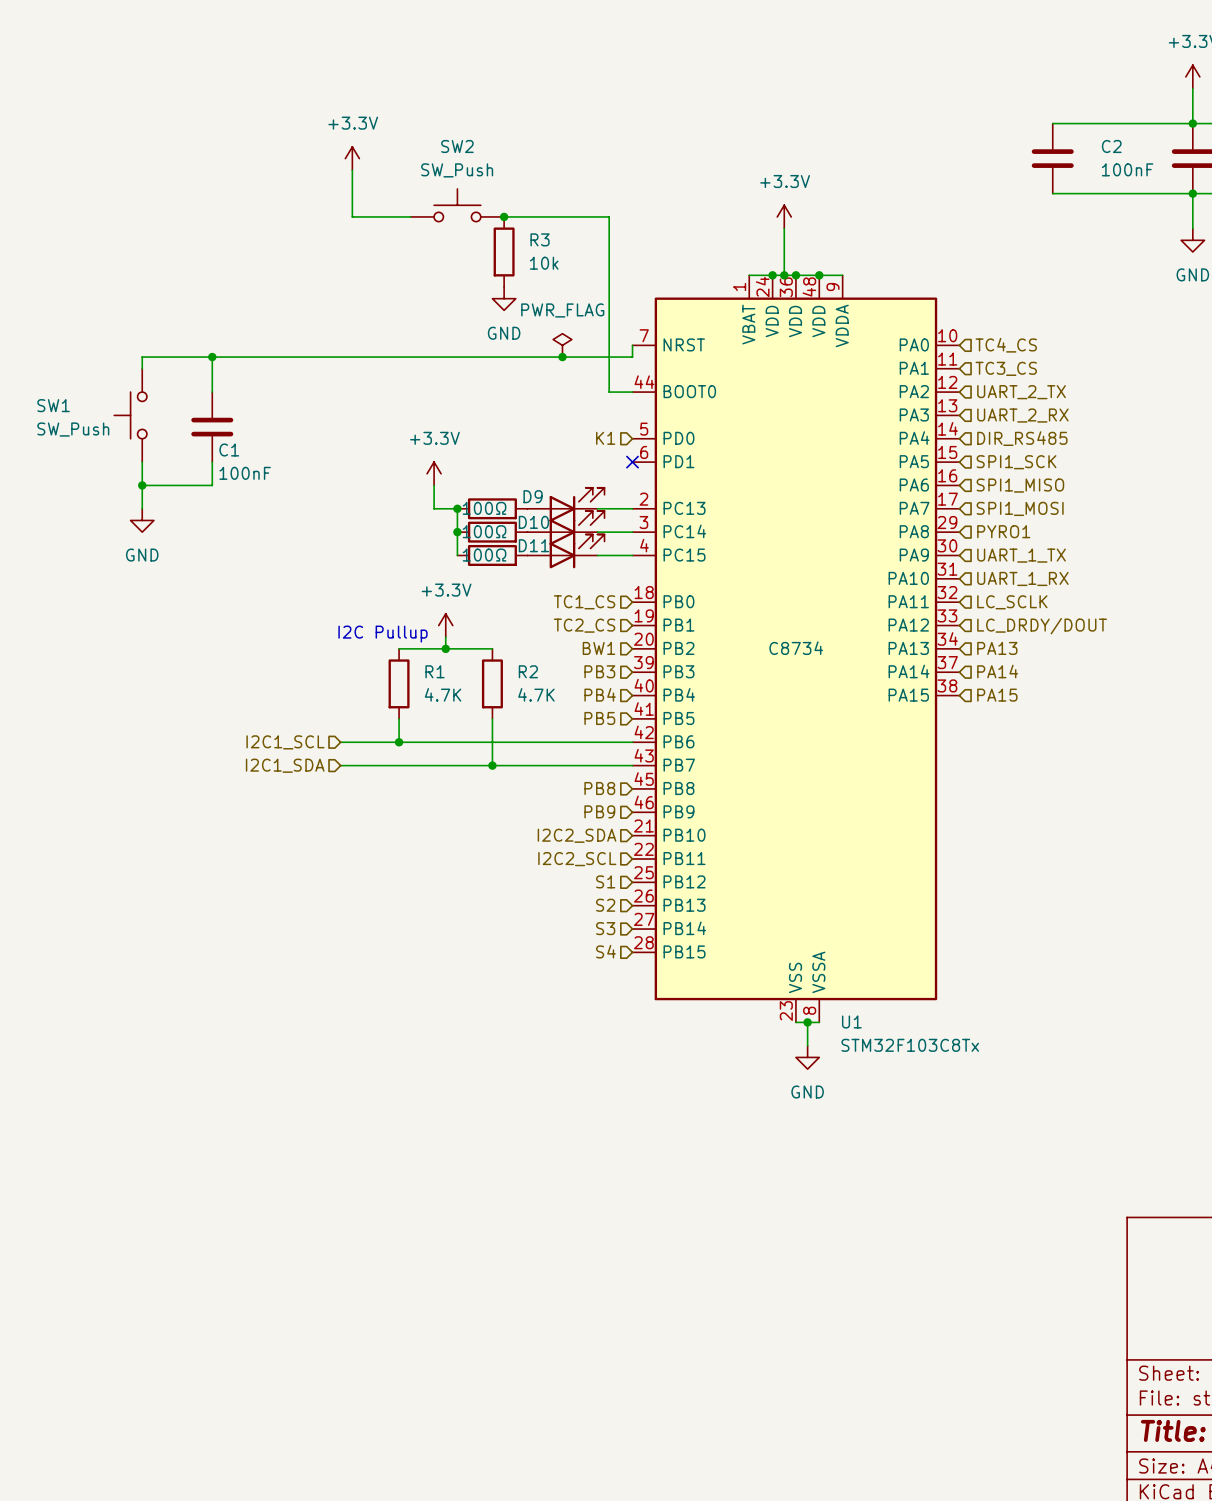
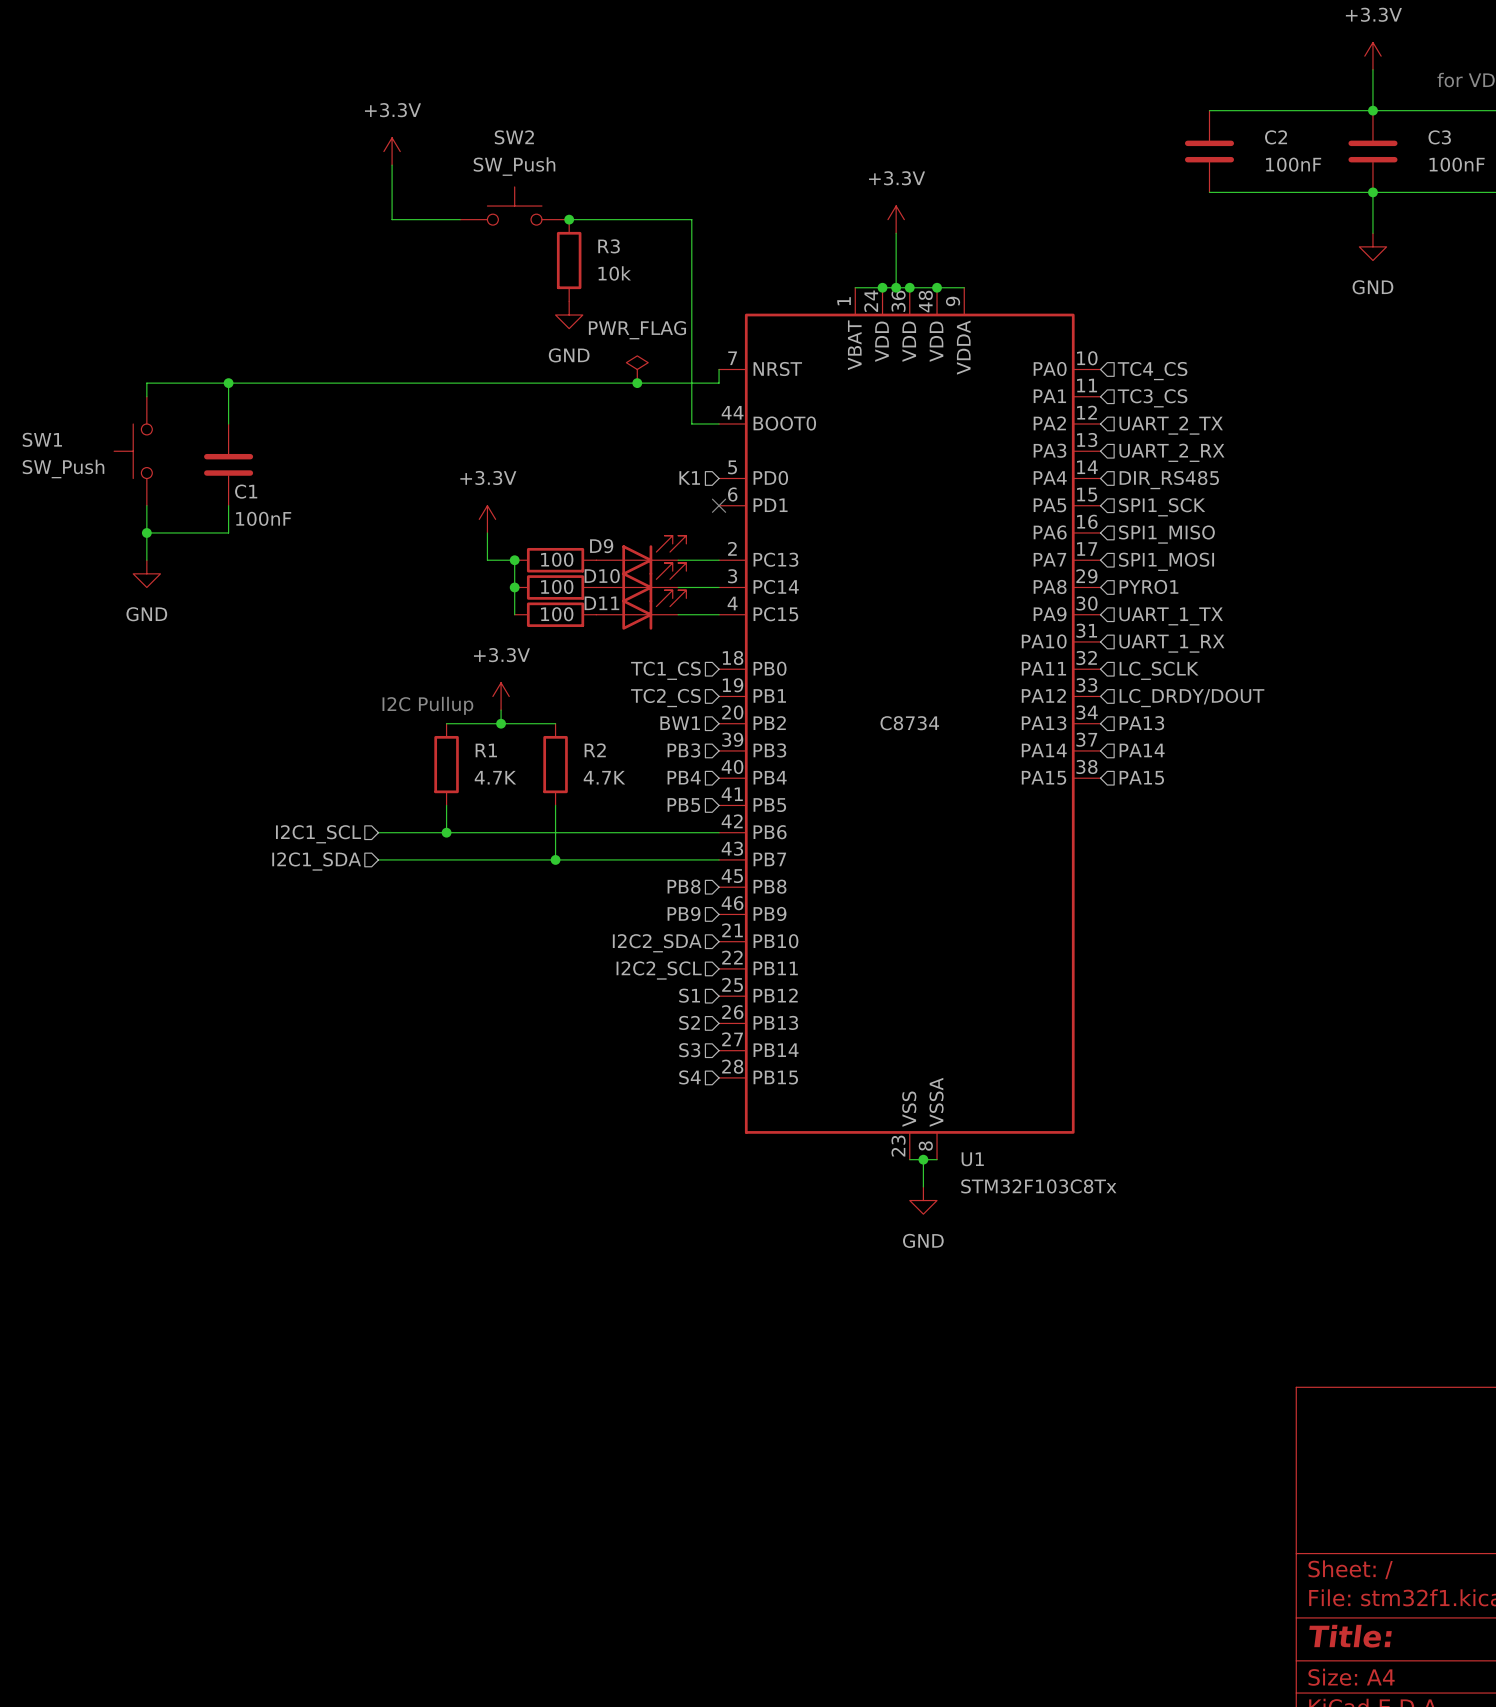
part value: 100Ω (484, 508) -> 100 (557, 559)
part value: 100Ω (484, 531) -> 100 (557, 586)
part value: 100Ω (484, 555) -> 100 (557, 614)

